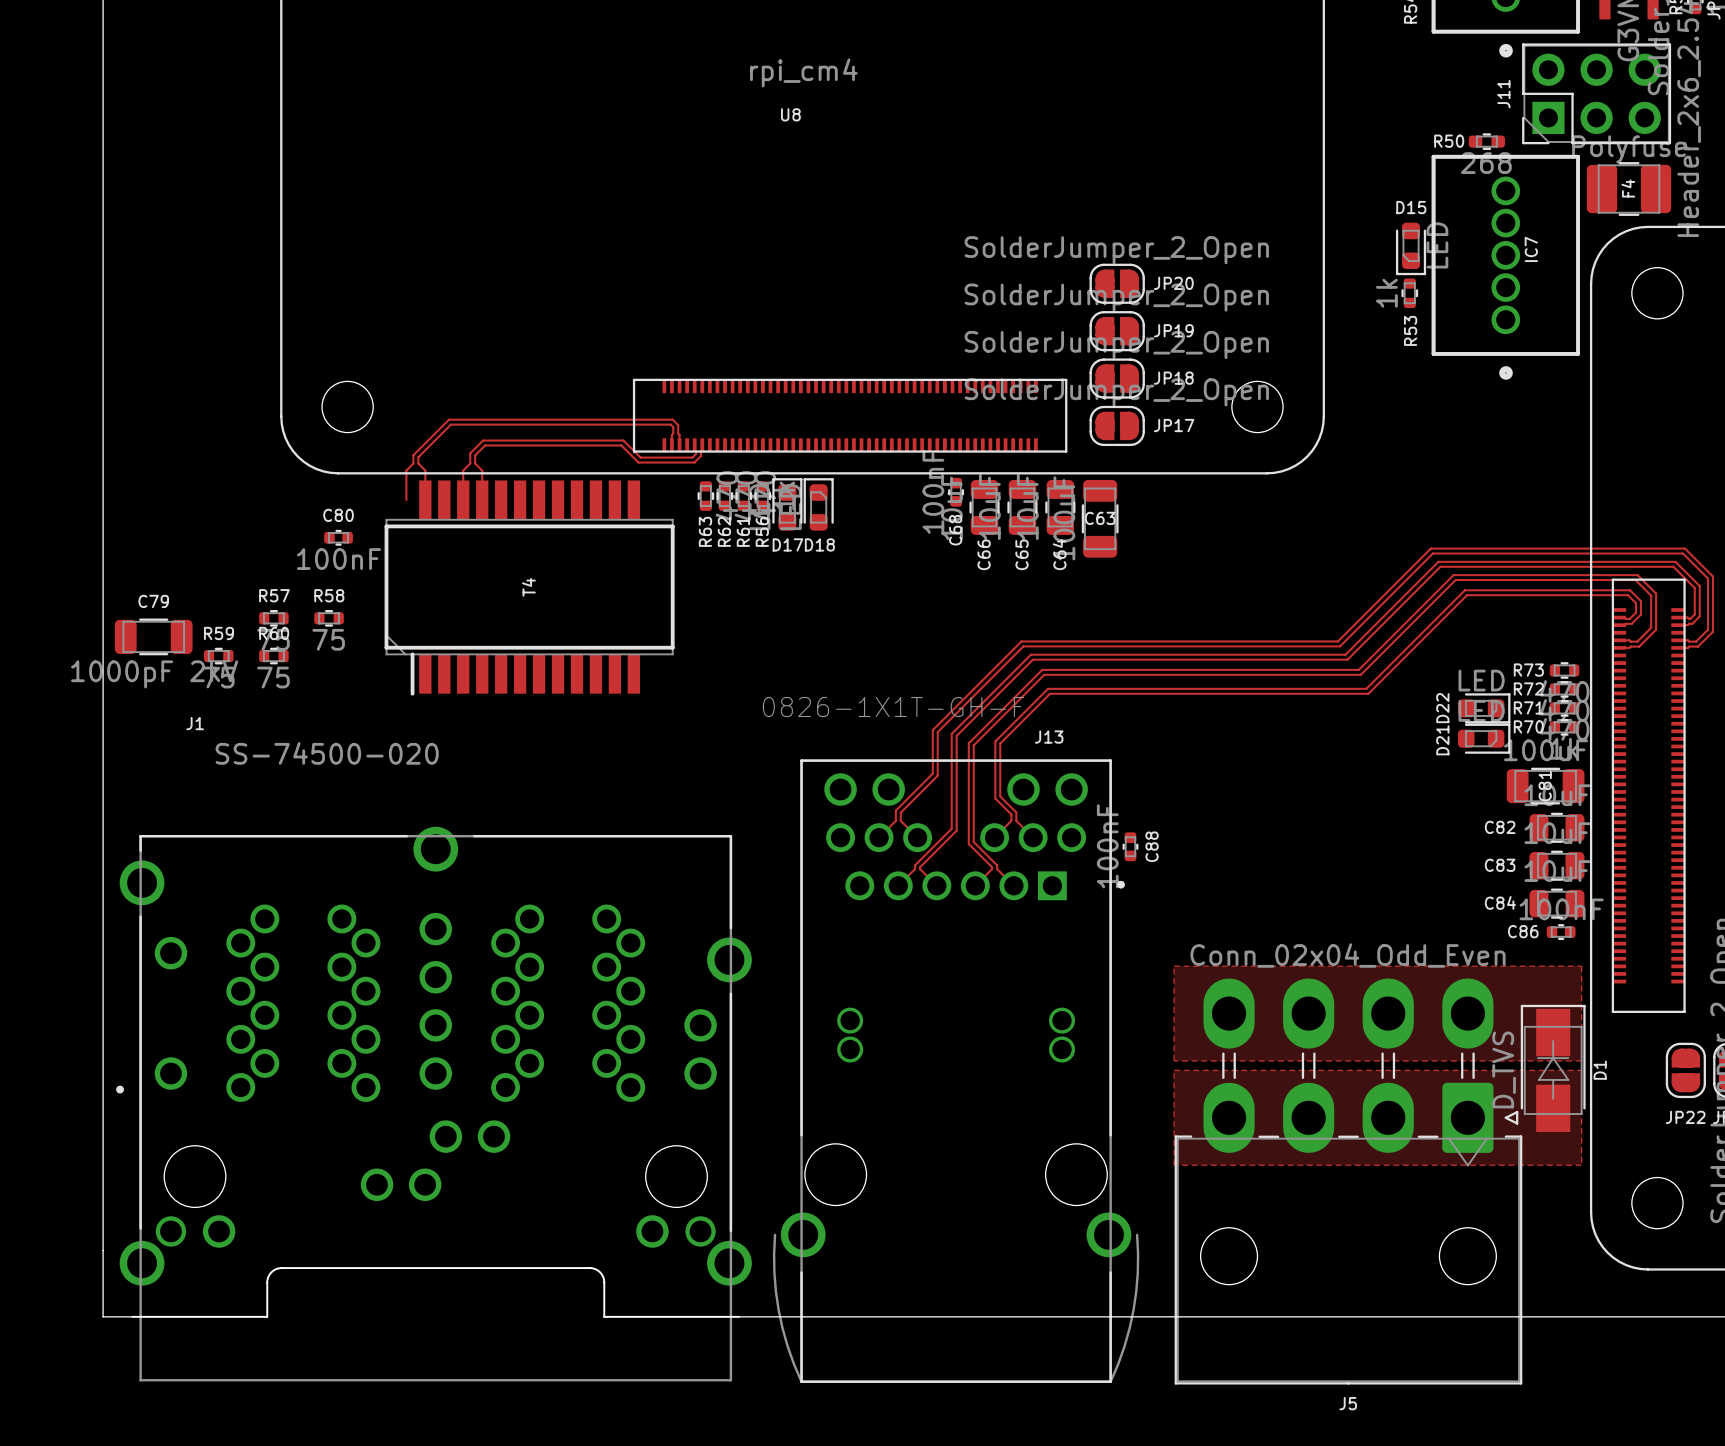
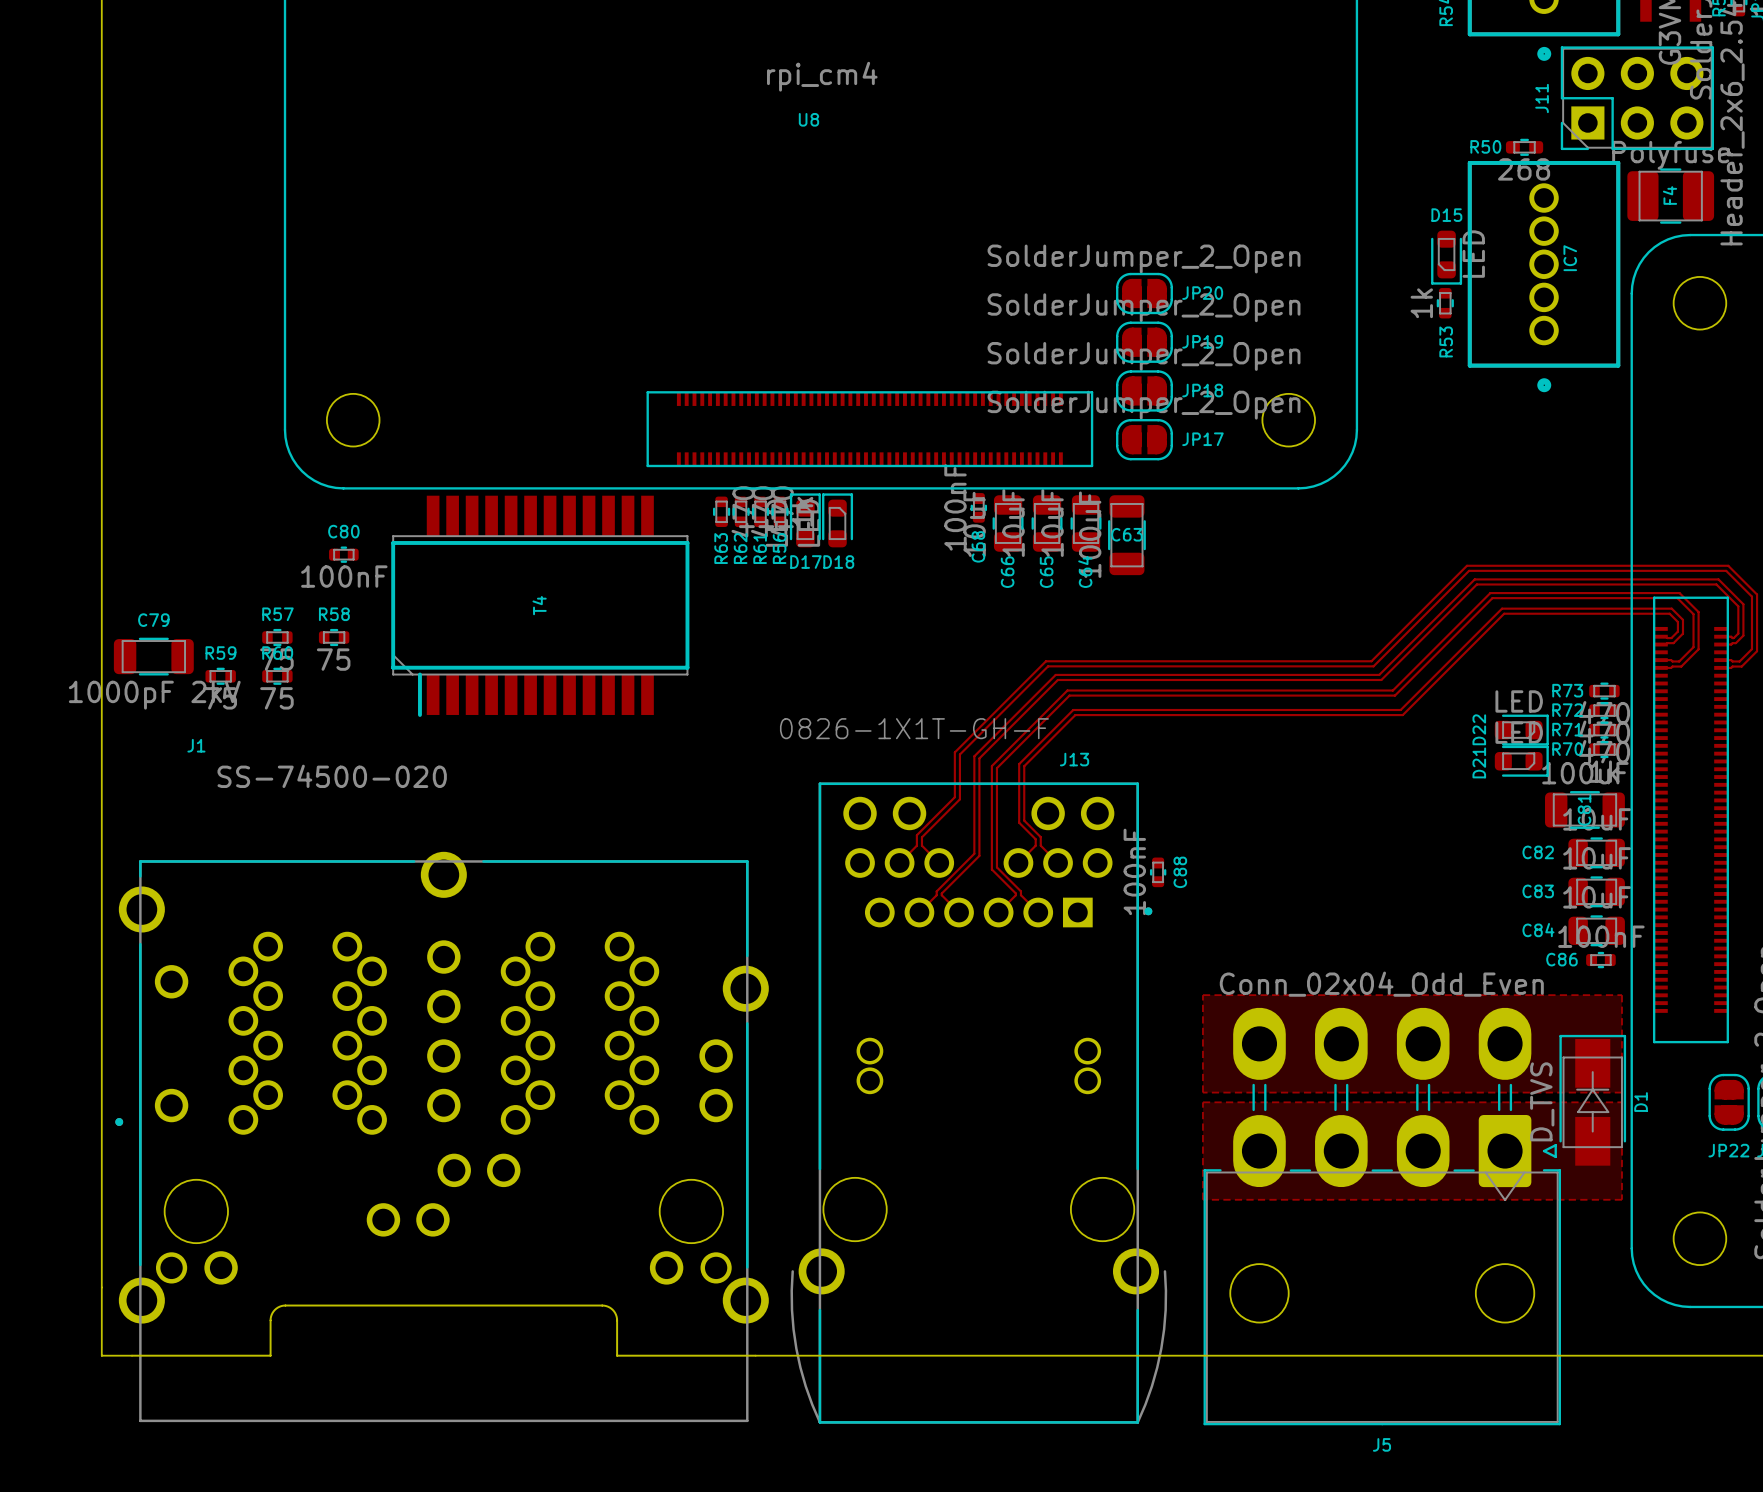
track: (671, 444) (673, 427) (670, 424) (451, 424) (418, 457) (418, 463) (425, 470) (425, 500) -> none
track: (679, 444) (678, 425) (672, 419) (448, 419) (413, 455) (413, 463) (406, 470) (406, 500) -> none
track: (694, 444) (696, 454) (692, 457) (640, 457) (623, 440) (483, 440) (470, 453) (470, 463) (463, 470) (463, 500) -> none
track: (702, 444) (700, 456) (694, 462) (638, 462) (621, 445) (485, 445) (475, 455) (475, 463) (482, 470) (482, 500) -> none

